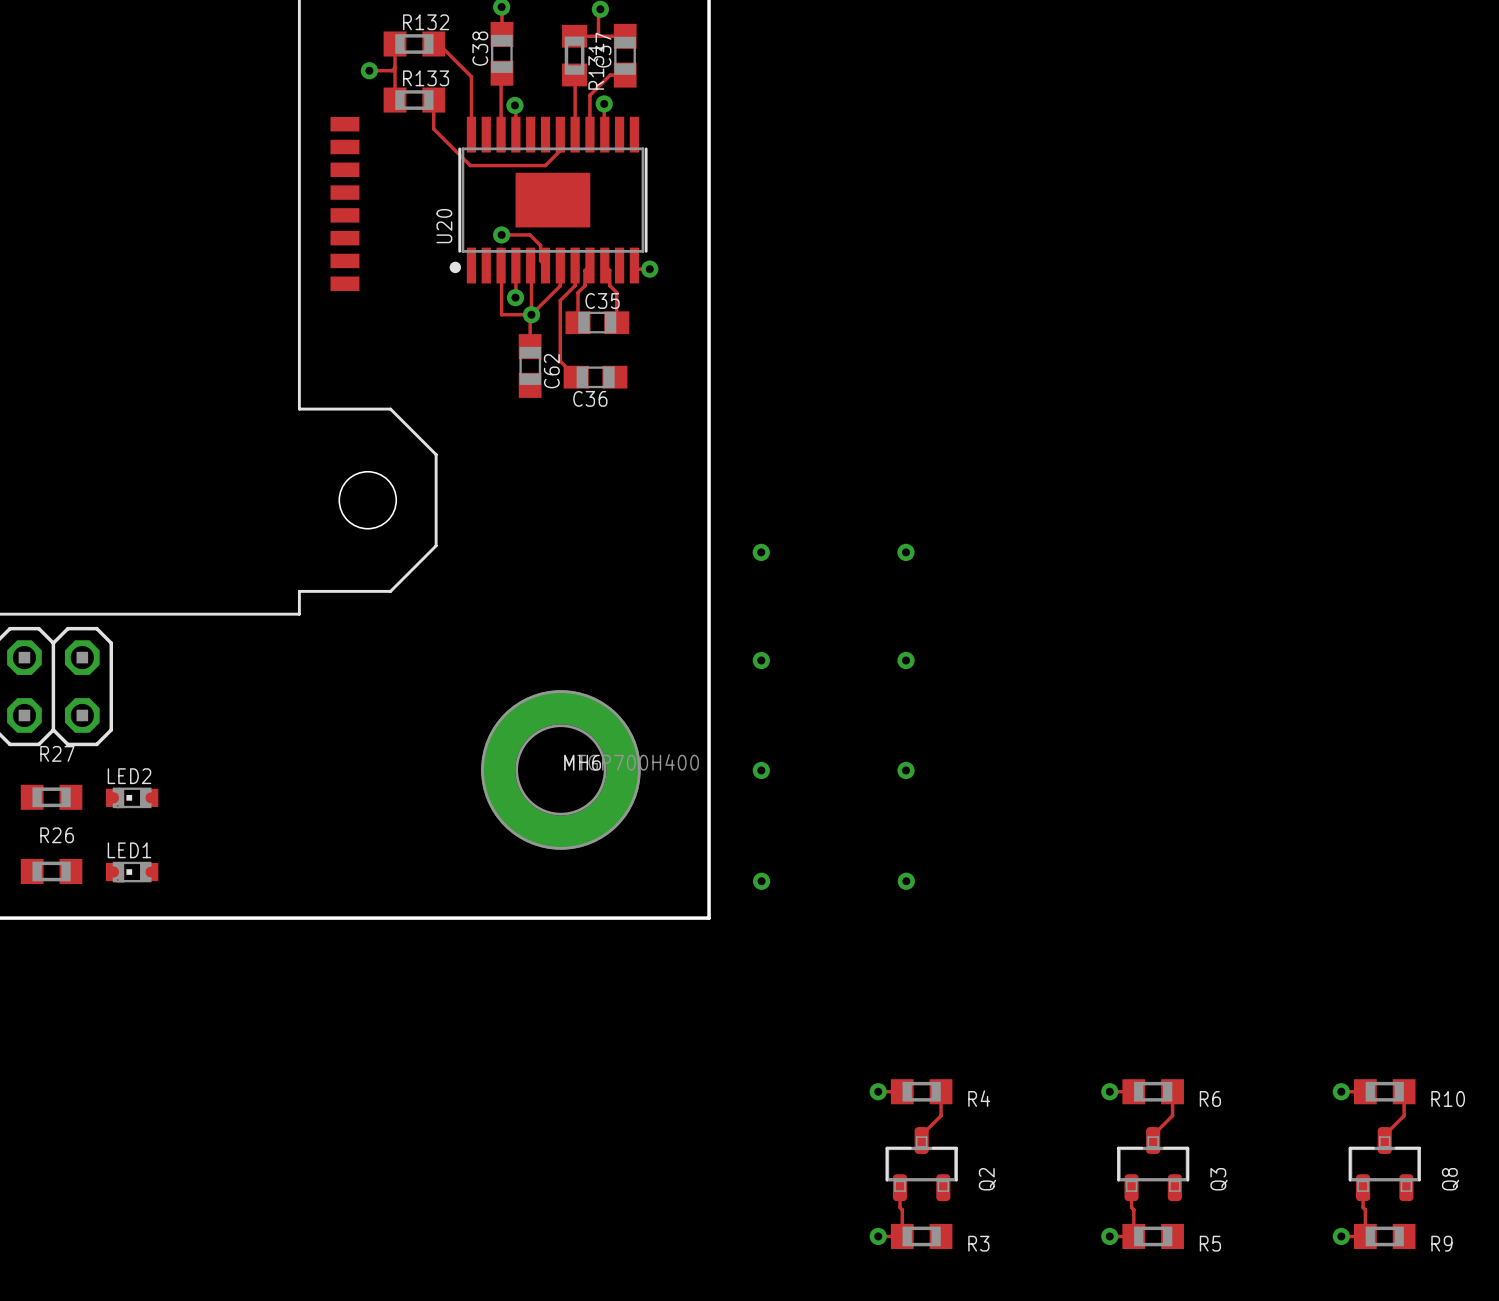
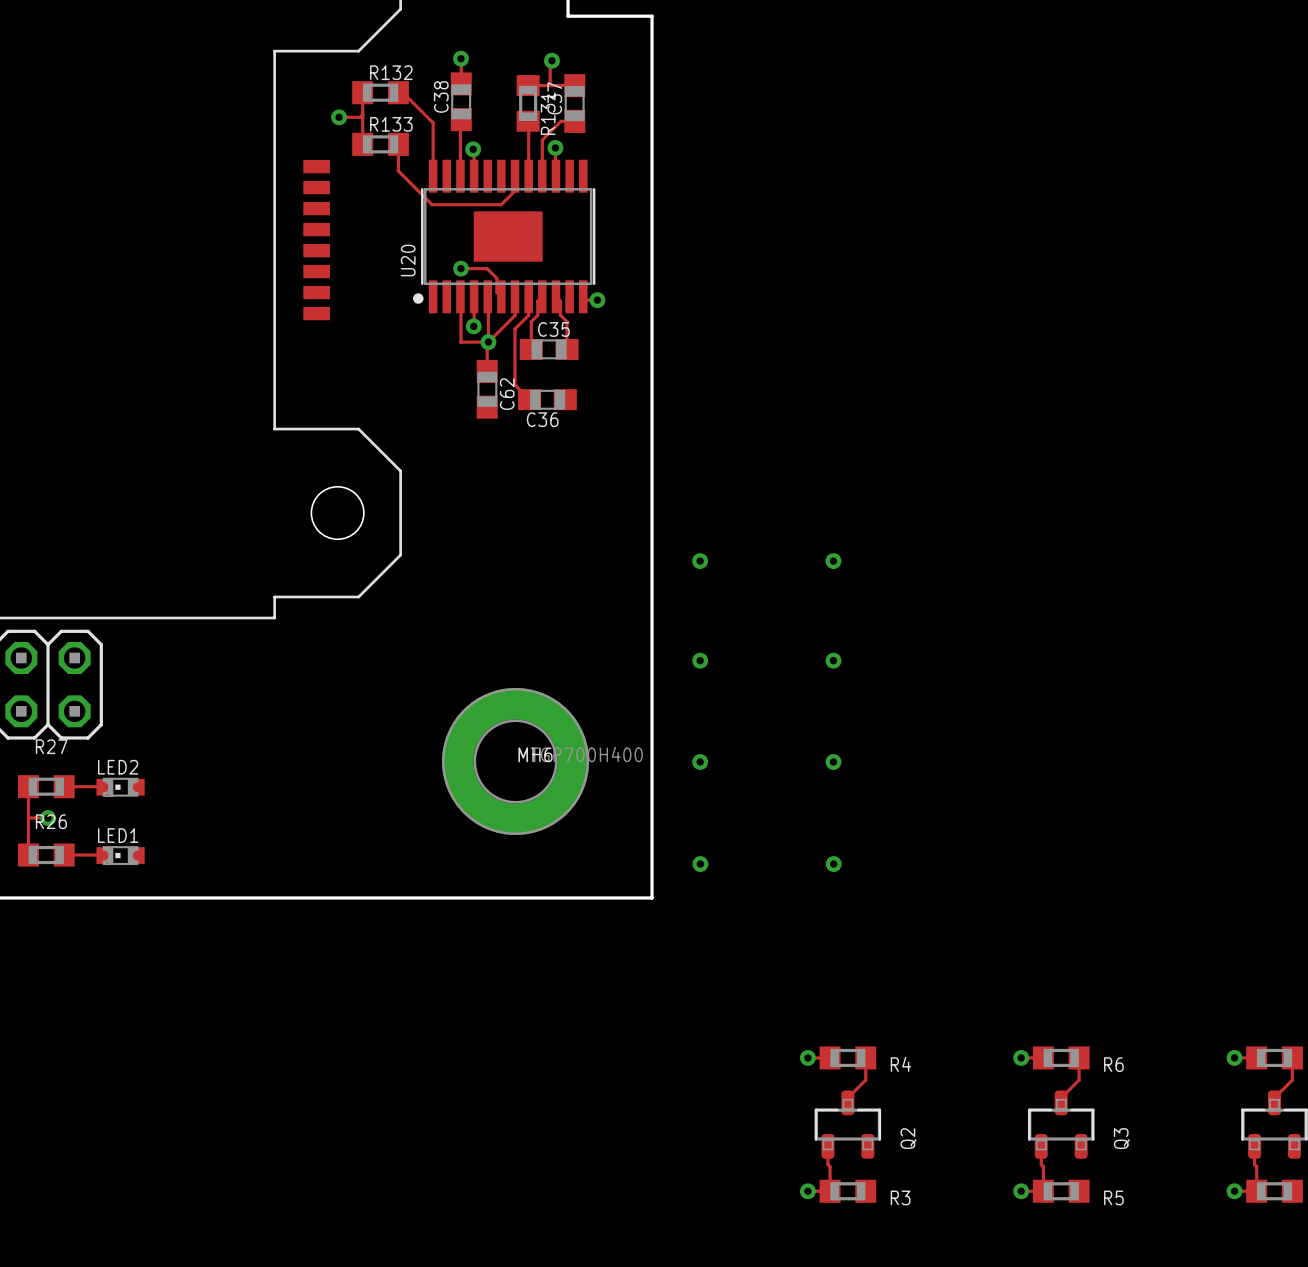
track: none -> (28, 786) (28, 855)
track: none -> (64, 786) (104, 787)
track: none -> (28, 817) (48, 817)
via: none -> (48, 817)
track: none -> (64, 855) (104, 855)

